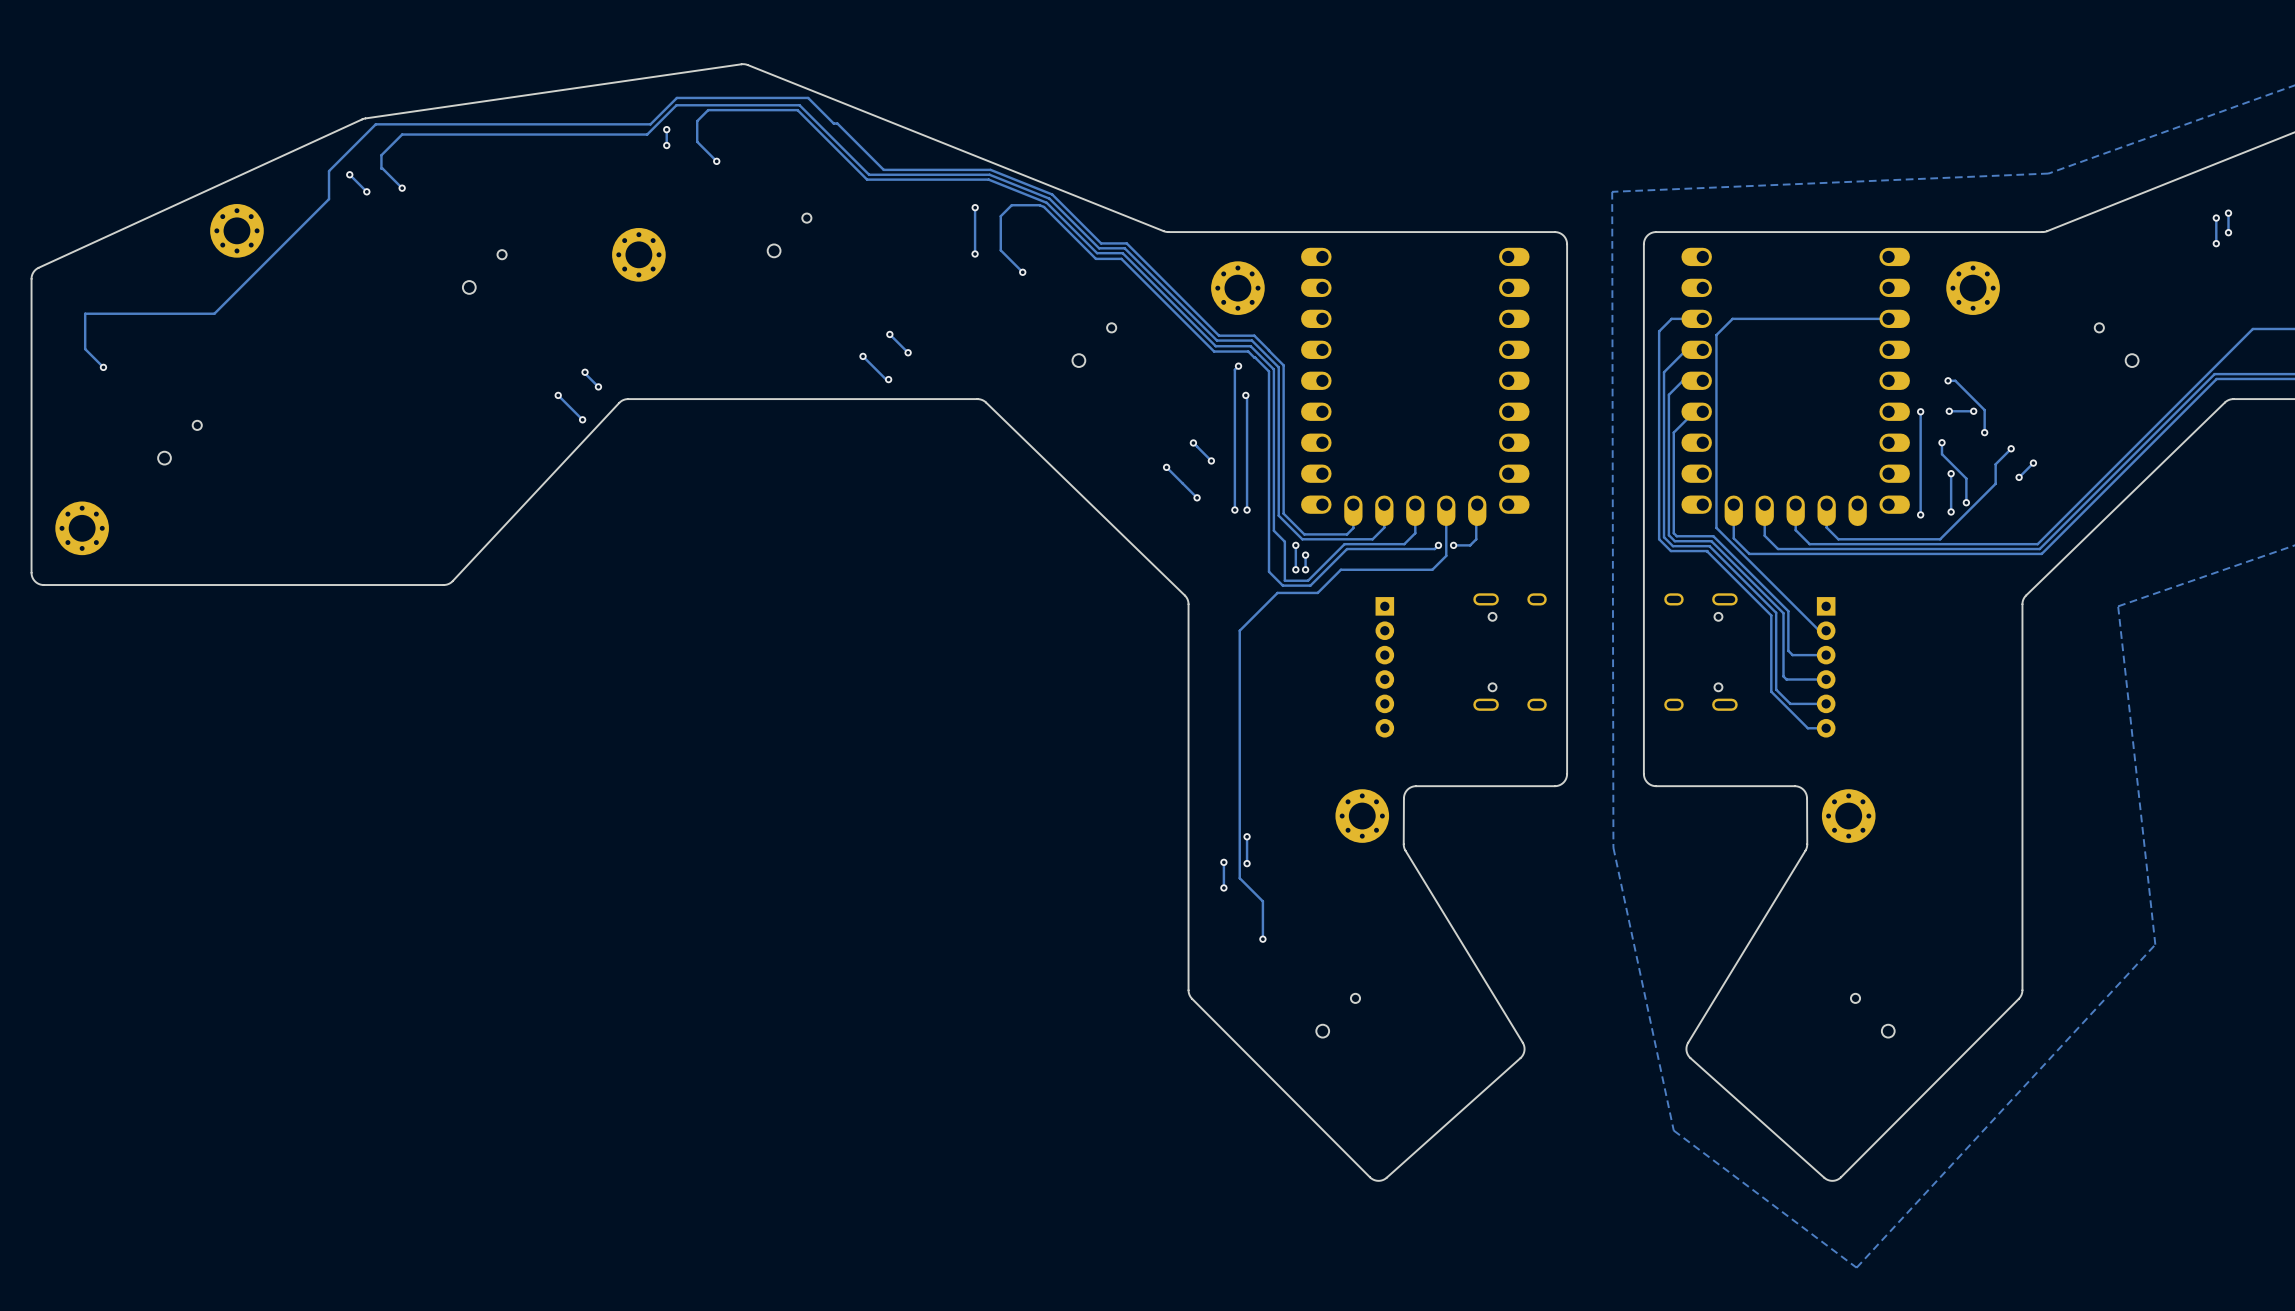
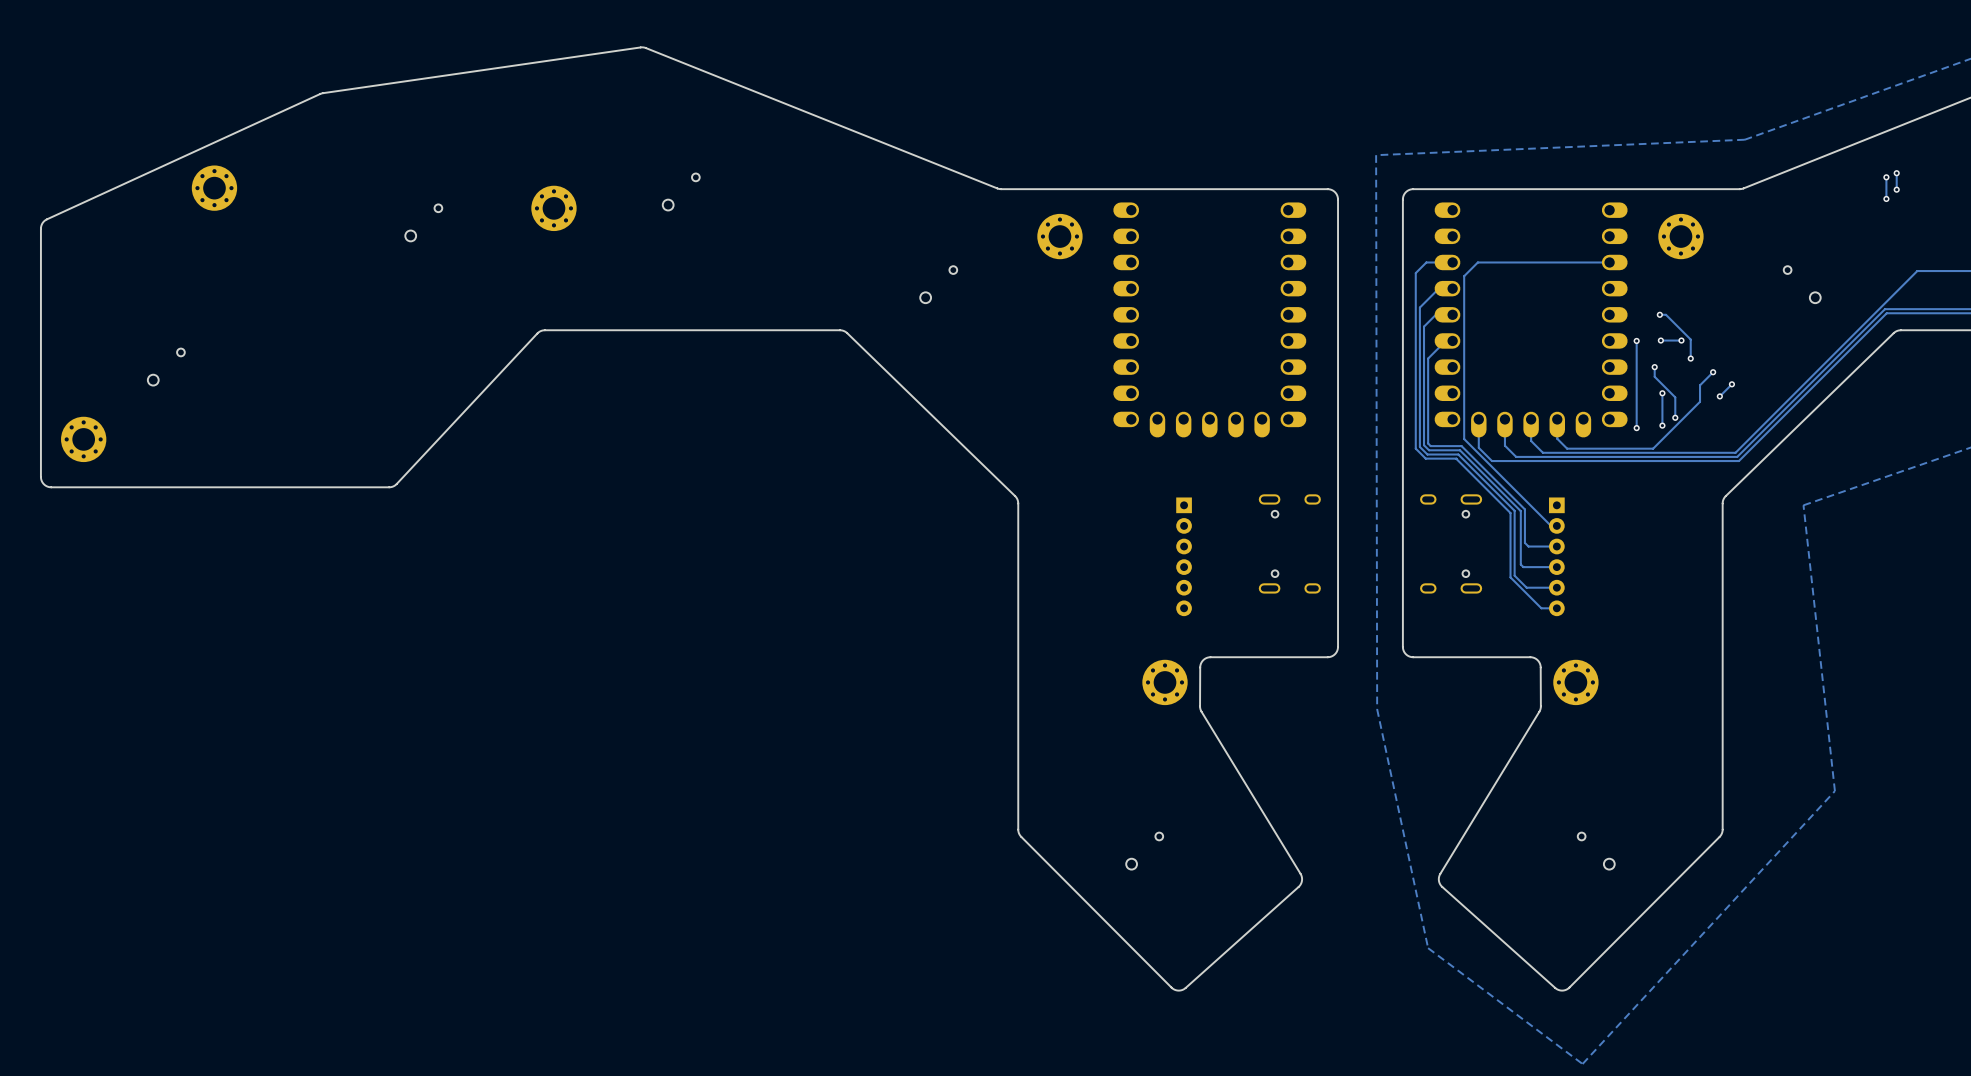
track: (666, 129) (666, 145) -> none
via: (666, 129) -> none
via: (666, 145) -> none
track: (716, 161) (697, 141) (697, 121) (708, 110) (797, 110) (867, 179) (988, 179) (1046, 202) (1097, 253) (1122, 253) (1215, 346) (1250, 346) (1273, 369) (1273, 530) (1284, 541) (1284, 580) (1308, 580) (1344, 544) (1404, 544) (1415, 533) (1415, 504) -> none
via: (716, 161) -> none
track: (349, 174) (366, 191) -> none
via: (349, 174) -> none
track: (402, 188) (381, 168) (381, 155) (402, 134) (647, 134) (676, 105) (799, 105) (869, 174) (989, 174) (1049, 198) (1099, 248) (1124, 248) (1217, 340) (1251, 340) (1278, 367) (1278, 515) (1302, 539) (1372, 539) (1384, 527) (1384, 504) -> none
via: (402, 188) -> none
via: (366, 191) -> none
track: (975, 207) (975, 254) -> none
via: (975, 207) -> none
via: (975, 254) -> none
track: (1022, 272) (1000, 250) (1000, 216) (1011, 205) (1039, 205) (1044, 206) (1095, 258) (1121, 258) (1214, 351) (1248, 351) (1269, 371) (1269, 571) (1282, 585) (1310, 585) (1347, 549) (1434, 549) (1438, 545) -> none
via: (1022, 272) -> none
track: (889, 334) (908, 352) -> none
via: (889, 334) -> none
via: (908, 352) -> none
track: (863, 356) (886, 379) (888, 379) -> none
via: (863, 356) -> none
track: (1238, 366) (1234, 369) (1234, 510) -> none
via: (1238, 366) -> none
track: (103, 367) (85, 349) (85, 313) (214, 313) (329, 199) (329, 171) (375, 124) (650, 124) (676, 97) (808, 97) (833, 123) (837, 123) (883, 169) (990, 169) (1052, 194) (1101, 243) (1126, 243) (1219, 335) (1254, 335) (1283, 365) (1283, 513) (1304, 534) (1347, 534) (1353, 528) (1353, 504) -> none
via: (103, 367) -> none
track: (585, 372) (598, 386) -> none
via: (585, 372) -> none
via: (888, 379) -> none
via: (598, 386) -> none
track: (558, 395) (582, 419) -> none
via: (558, 395) -> none
track: (1245, 395) (1247, 510) -> none
via: (1245, 395) -> none
via: (582, 419) -> none
track: (1193, 442) (1211, 460) -> none
via: (1193, 442) -> none
via: (1211, 460) -> none
track: (1166, 467) (1197, 497) -> none
via: (1166, 467) -> none
via: (1197, 497) -> none
track: (1446, 504) (1446, 555) (1432, 569) (1340, 569) (1317, 592) (1277, 592) (1239, 630) (1239, 878) (1262, 901) (1262, 939) -> none
track: (1477, 504) (1476, 539) (1470, 545) (1453, 545) -> none
via: (1234, 510) -> none
via: (1247, 510) -> none
track: (1295, 545) (1295, 569) -> none
via: (1295, 545) -> none
via: (1438, 545) -> none
via: (1453, 545) -> none
track: (1305, 555) (1305, 569) -> none
via: (1305, 555) -> none
via: (1295, 569) -> none
via: (1305, 569) -> none
track: (1247, 836) (1247, 863) -> none
via: (1247, 836) -> none
track: (1223, 862) (1223, 887) -> none
via: (1223, 862) -> none
via: (1247, 863) -> none
via: (1223, 887) -> none
via: (1262, 939) -> none

